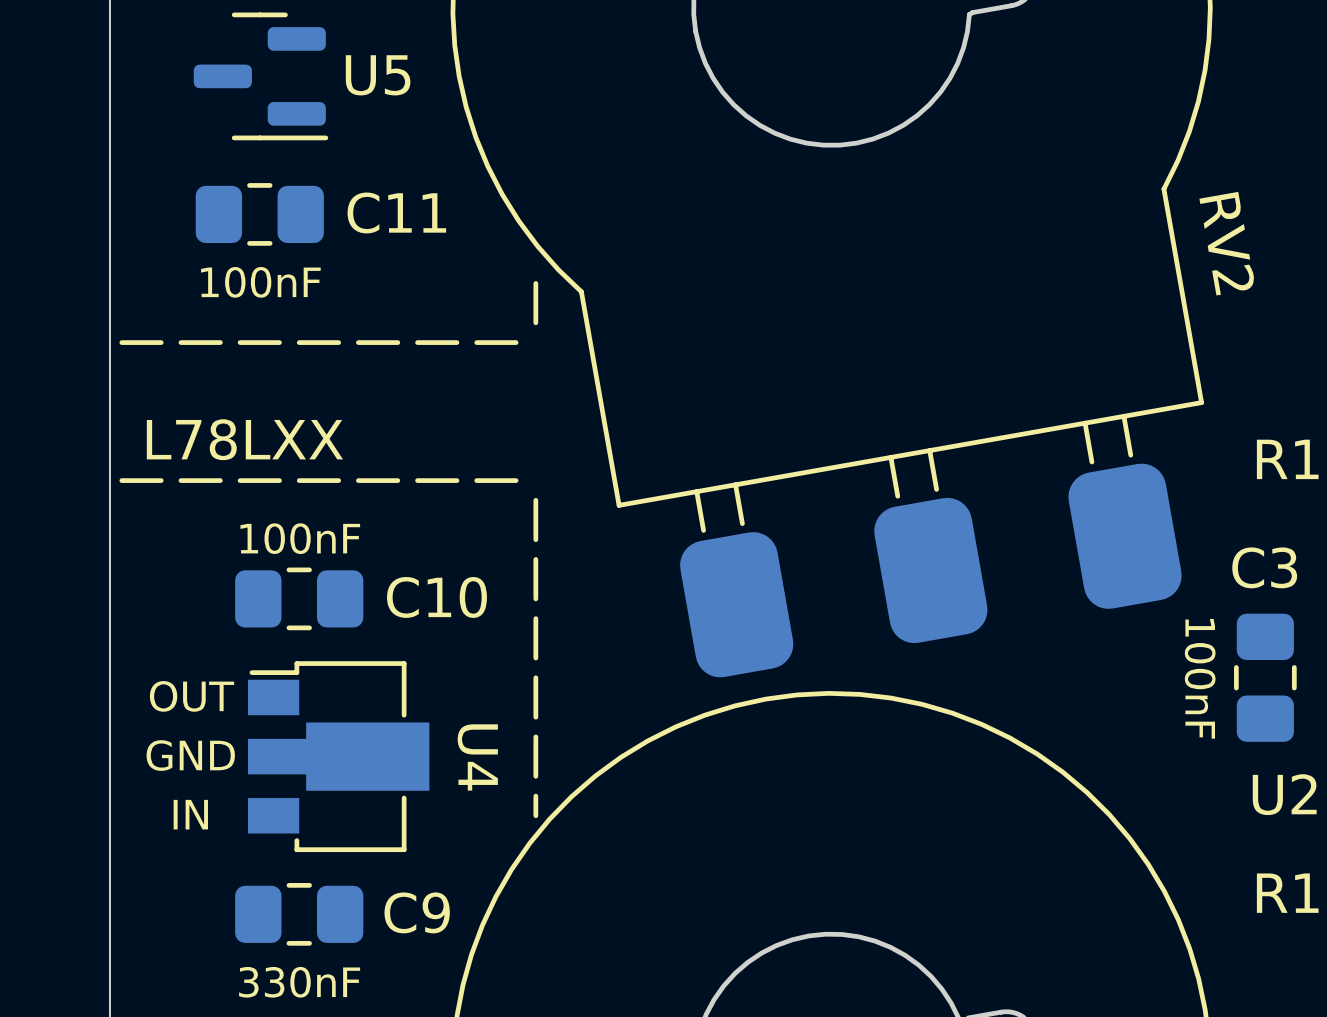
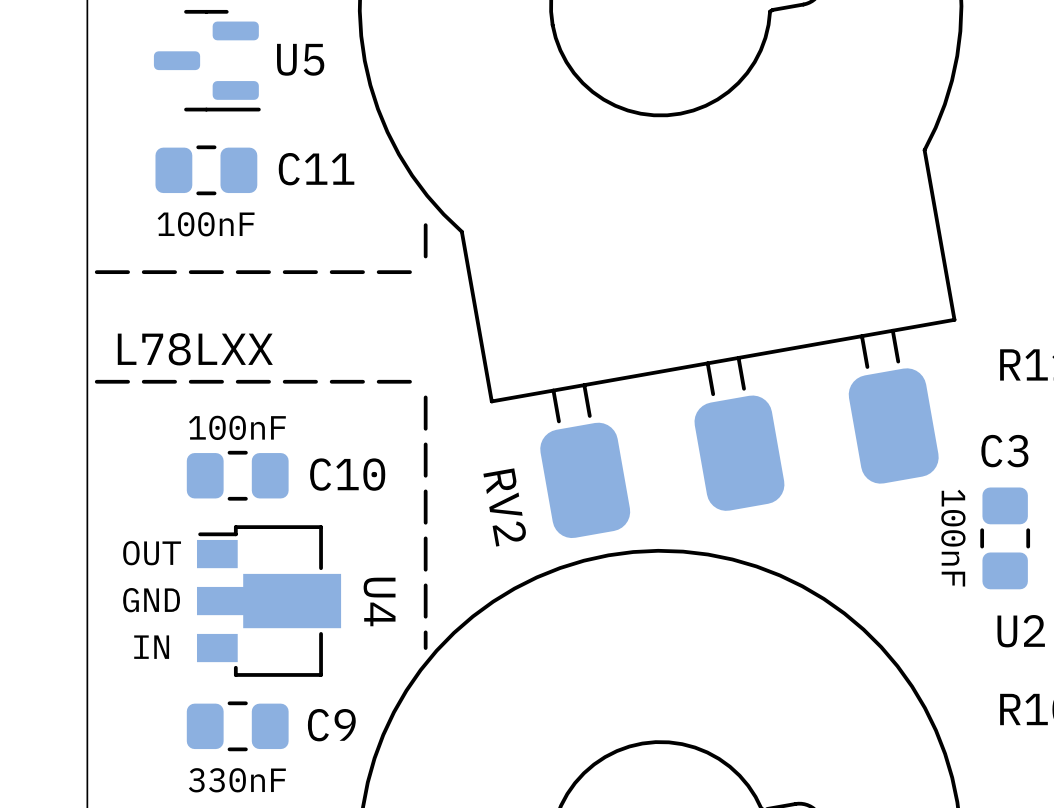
RV2 name position: RV2 (1227, 243) -> RV2 (504, 507)

